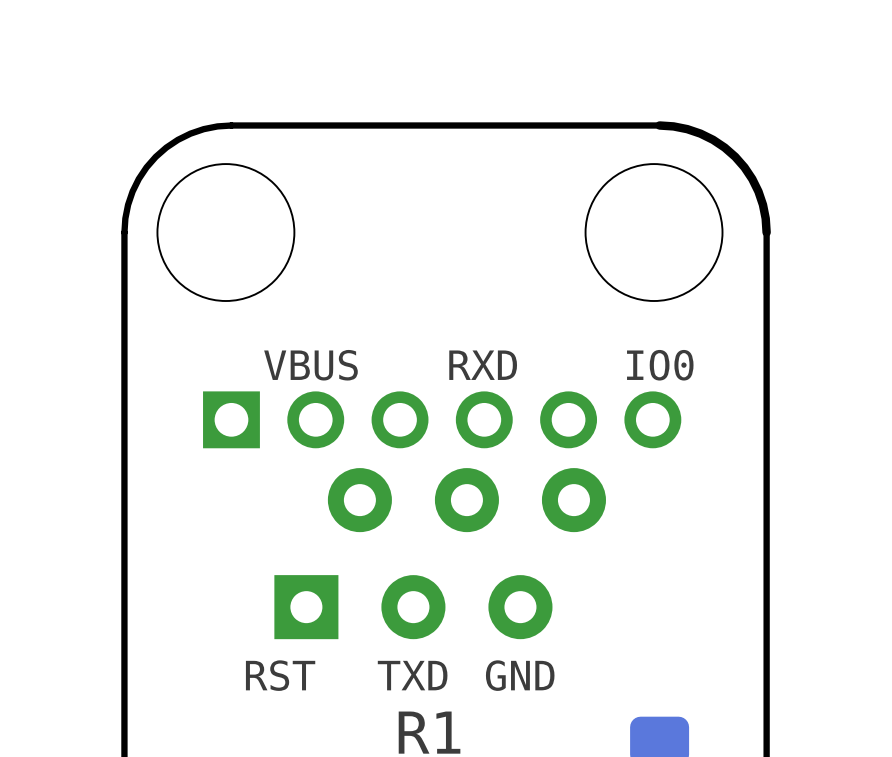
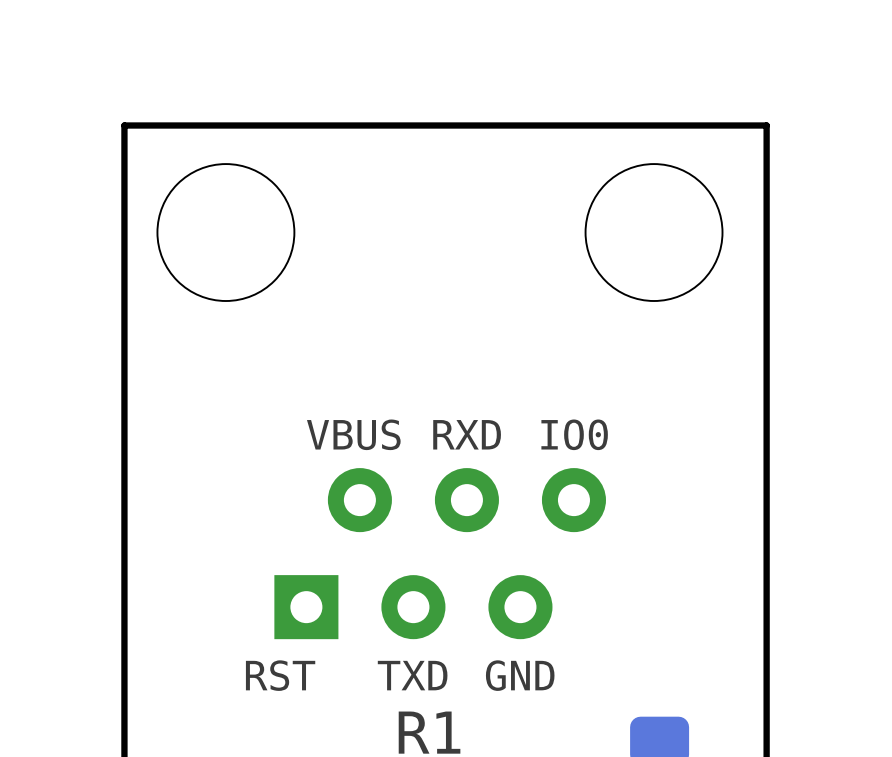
board edge: (231, 125) (203, 129) (190, 133) (166, 147) (155, 156) (138, 179) (132, 191) (125, 218) (124, 232) -> (231, 125) (124, 125) (124, 232)
board edge: (659, 125) (687, 129) (700, 133) (724, 147) (735, 156) (752, 179) (758, 191) (765, 218) (766, 232) -> (659, 125) (766, 125) (766, 232)
text position: VBUS (310, 365) -> VBUS (353, 434)
text position: RXD (483, 365) -> RXD (467, 434)
text position: IO0 (660, 365) -> IO0 (574, 434)
part: (442, 419) -> none

